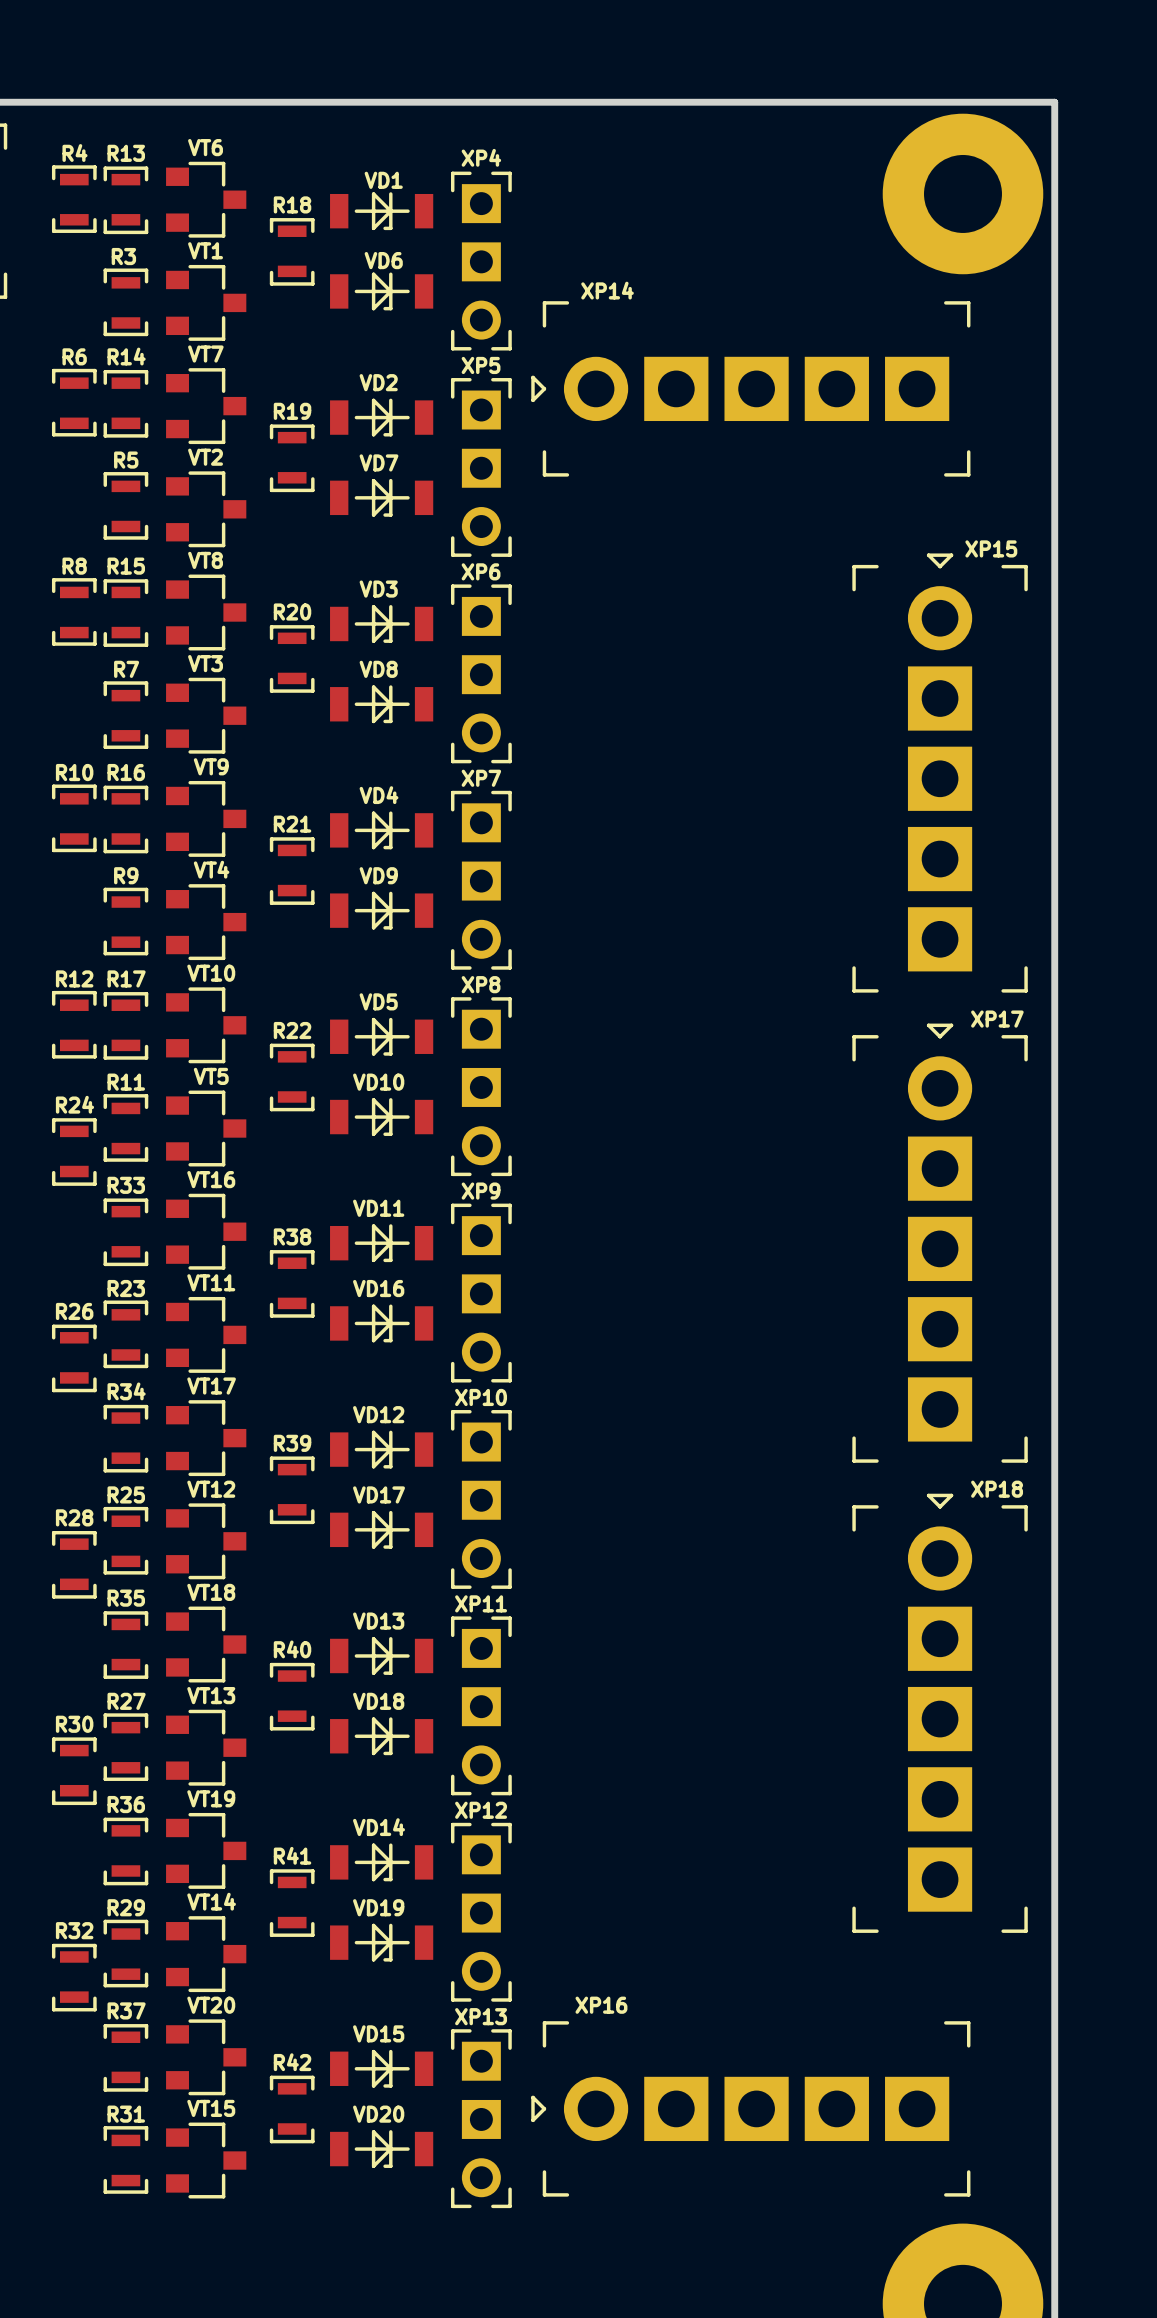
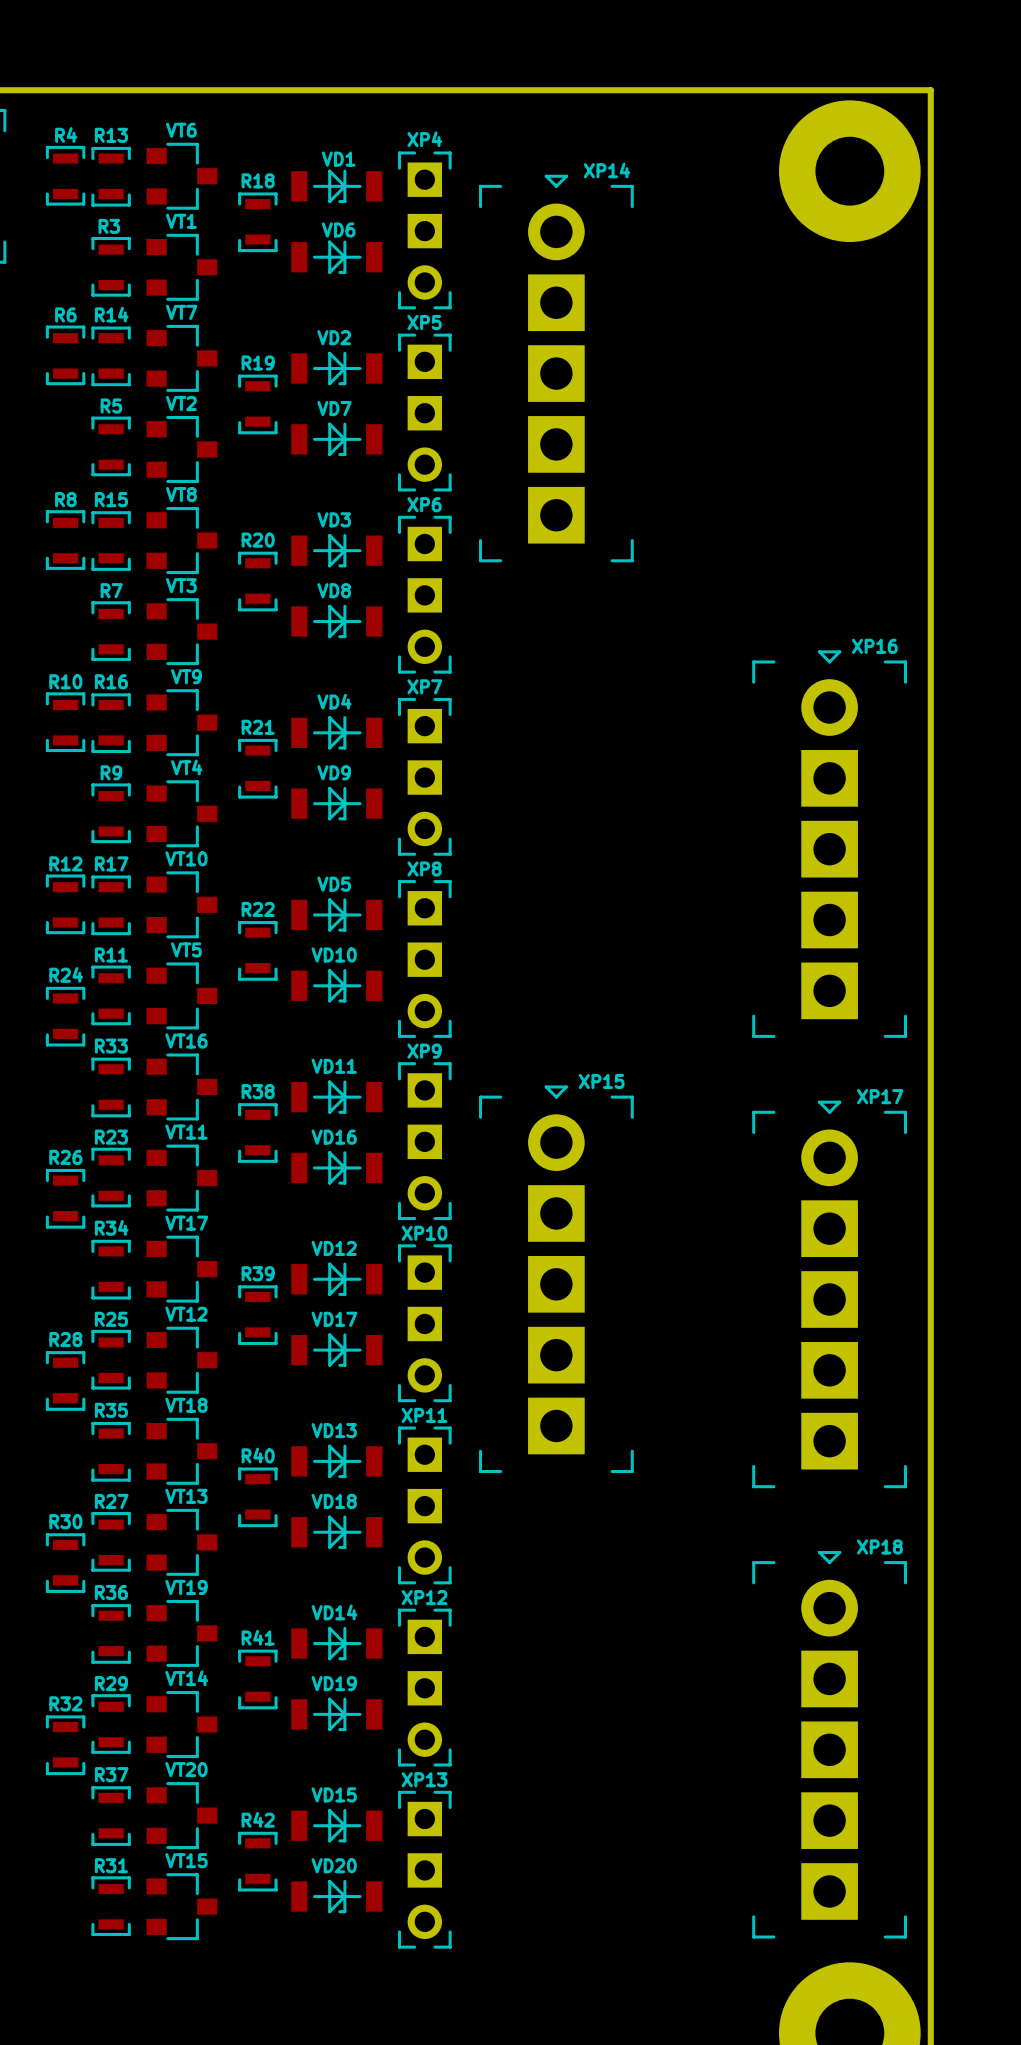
XP14 name position: XP14 (607, 290) -> XP14 (606, 170)
XP14 rotation: 0° (750, 388) -> 90° clockwise (556, 368)
XP15 position: (940, 773) -> (556, 1279)
XP17 position: (940, 1243) -> (829, 1294)
XP18 position: (940, 1713) -> (829, 1744)
XP16 name position: XP16 (601, 2005) -> XP16 (874, 646)
XP16 rotation: 0° (750, 2108) -> 90° clockwise (829, 844)
XP16 position: (750, 2108) -> (829, 844)

